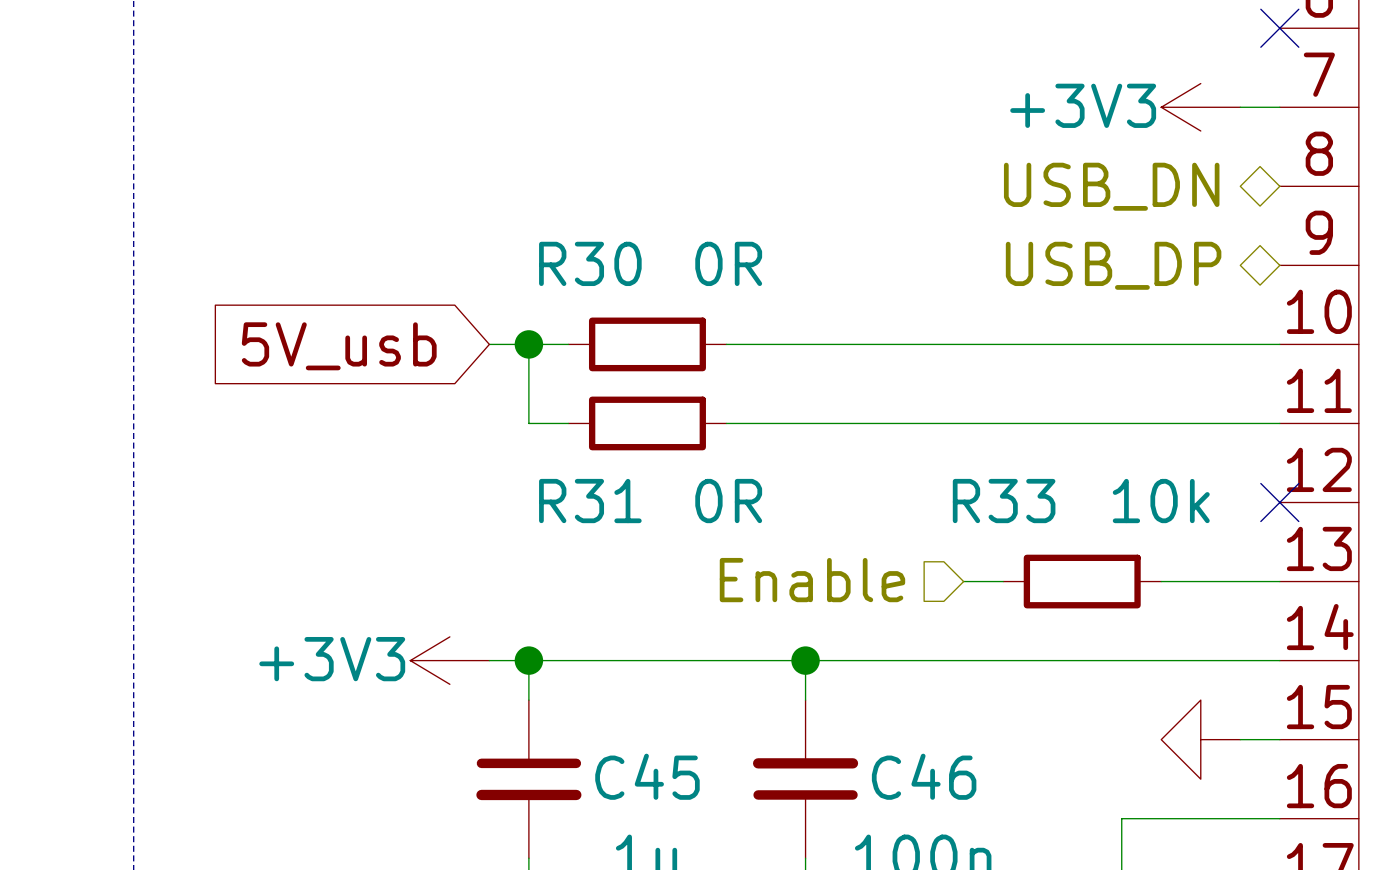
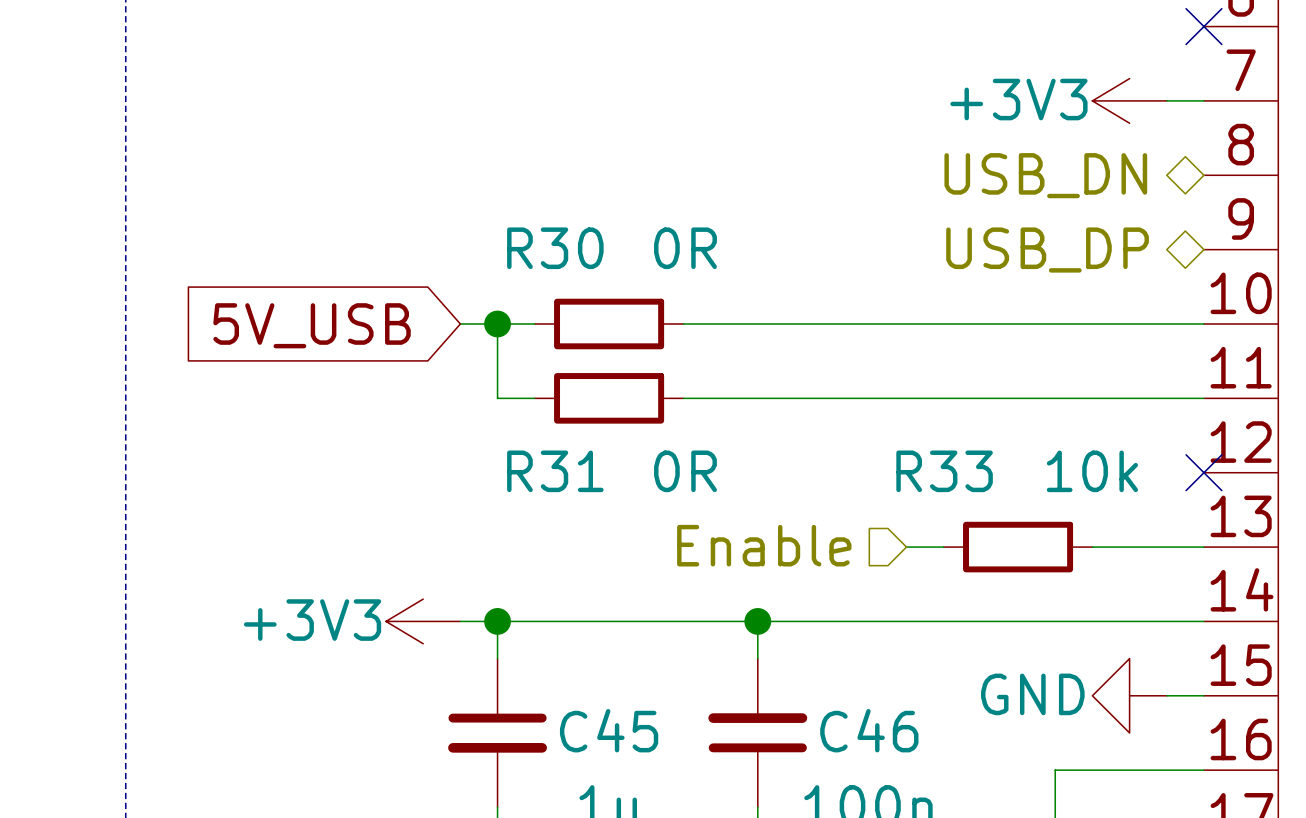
global label: 5V_usb (339, 346) -> 5V_USB (312, 325)
power symbol text: none -> GND (1032, 694)

